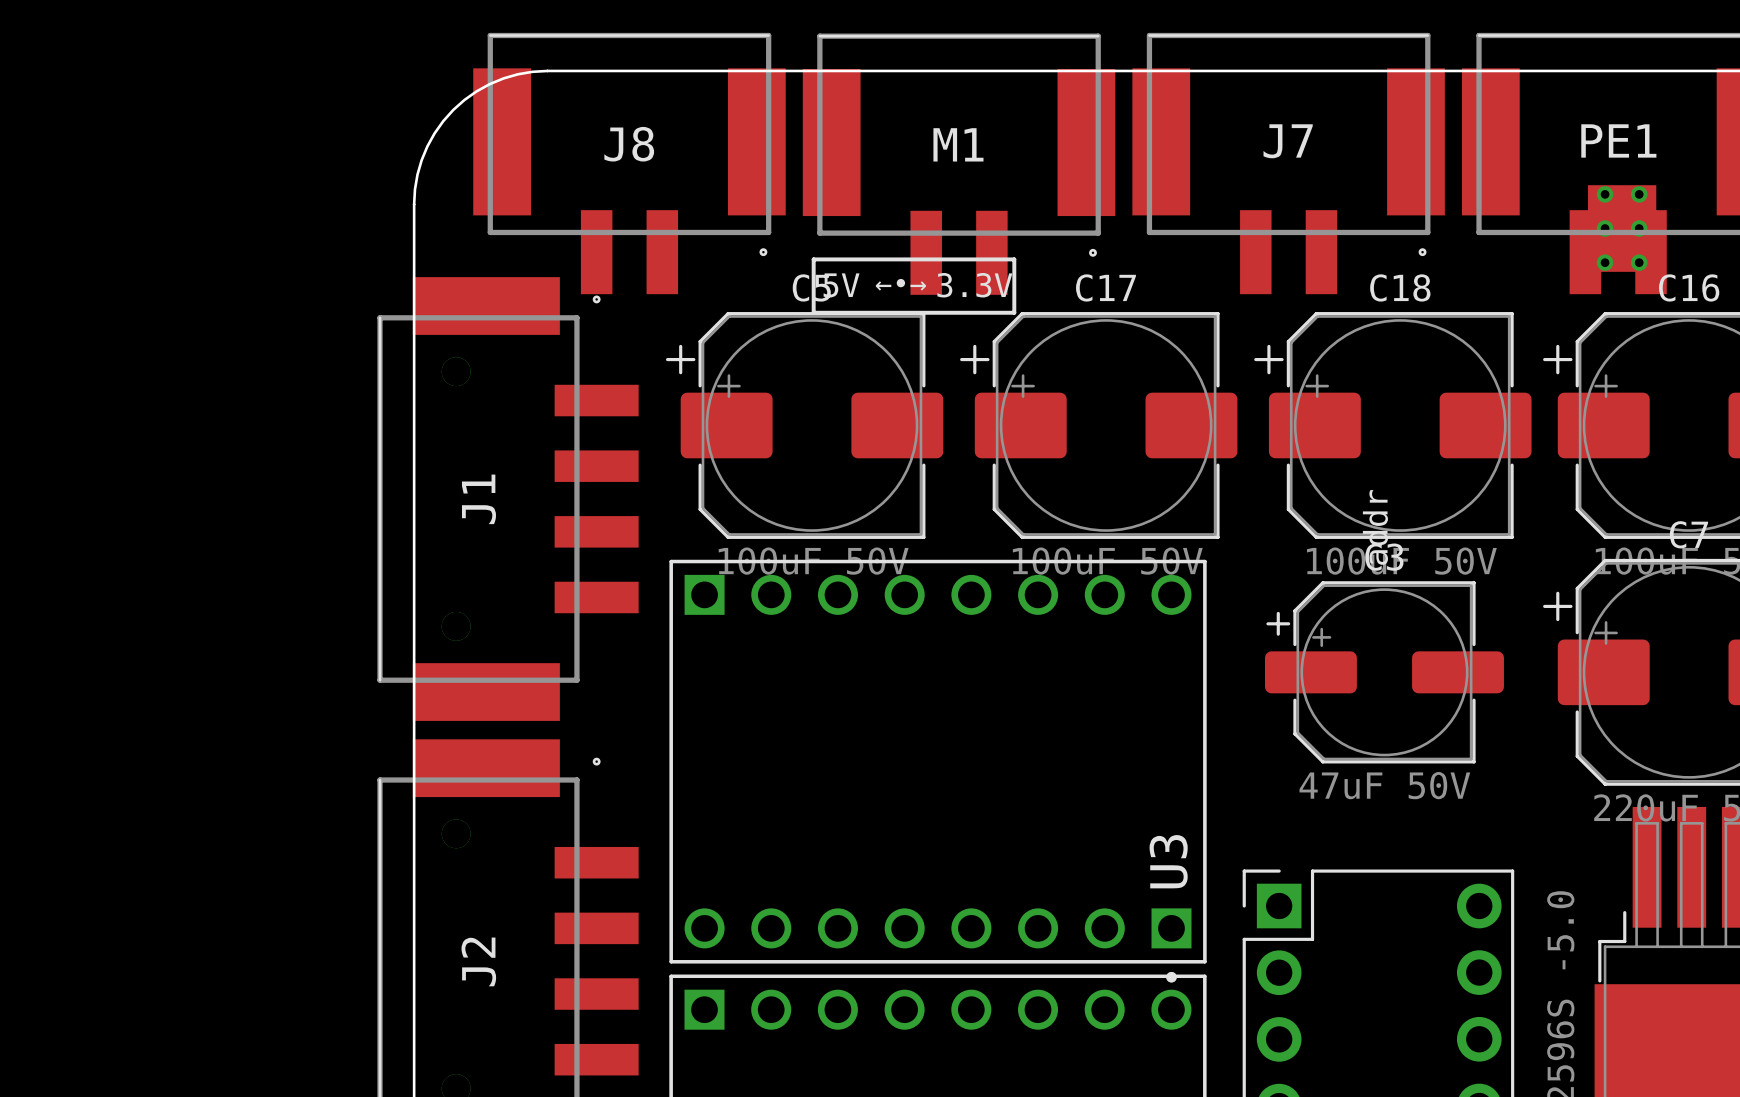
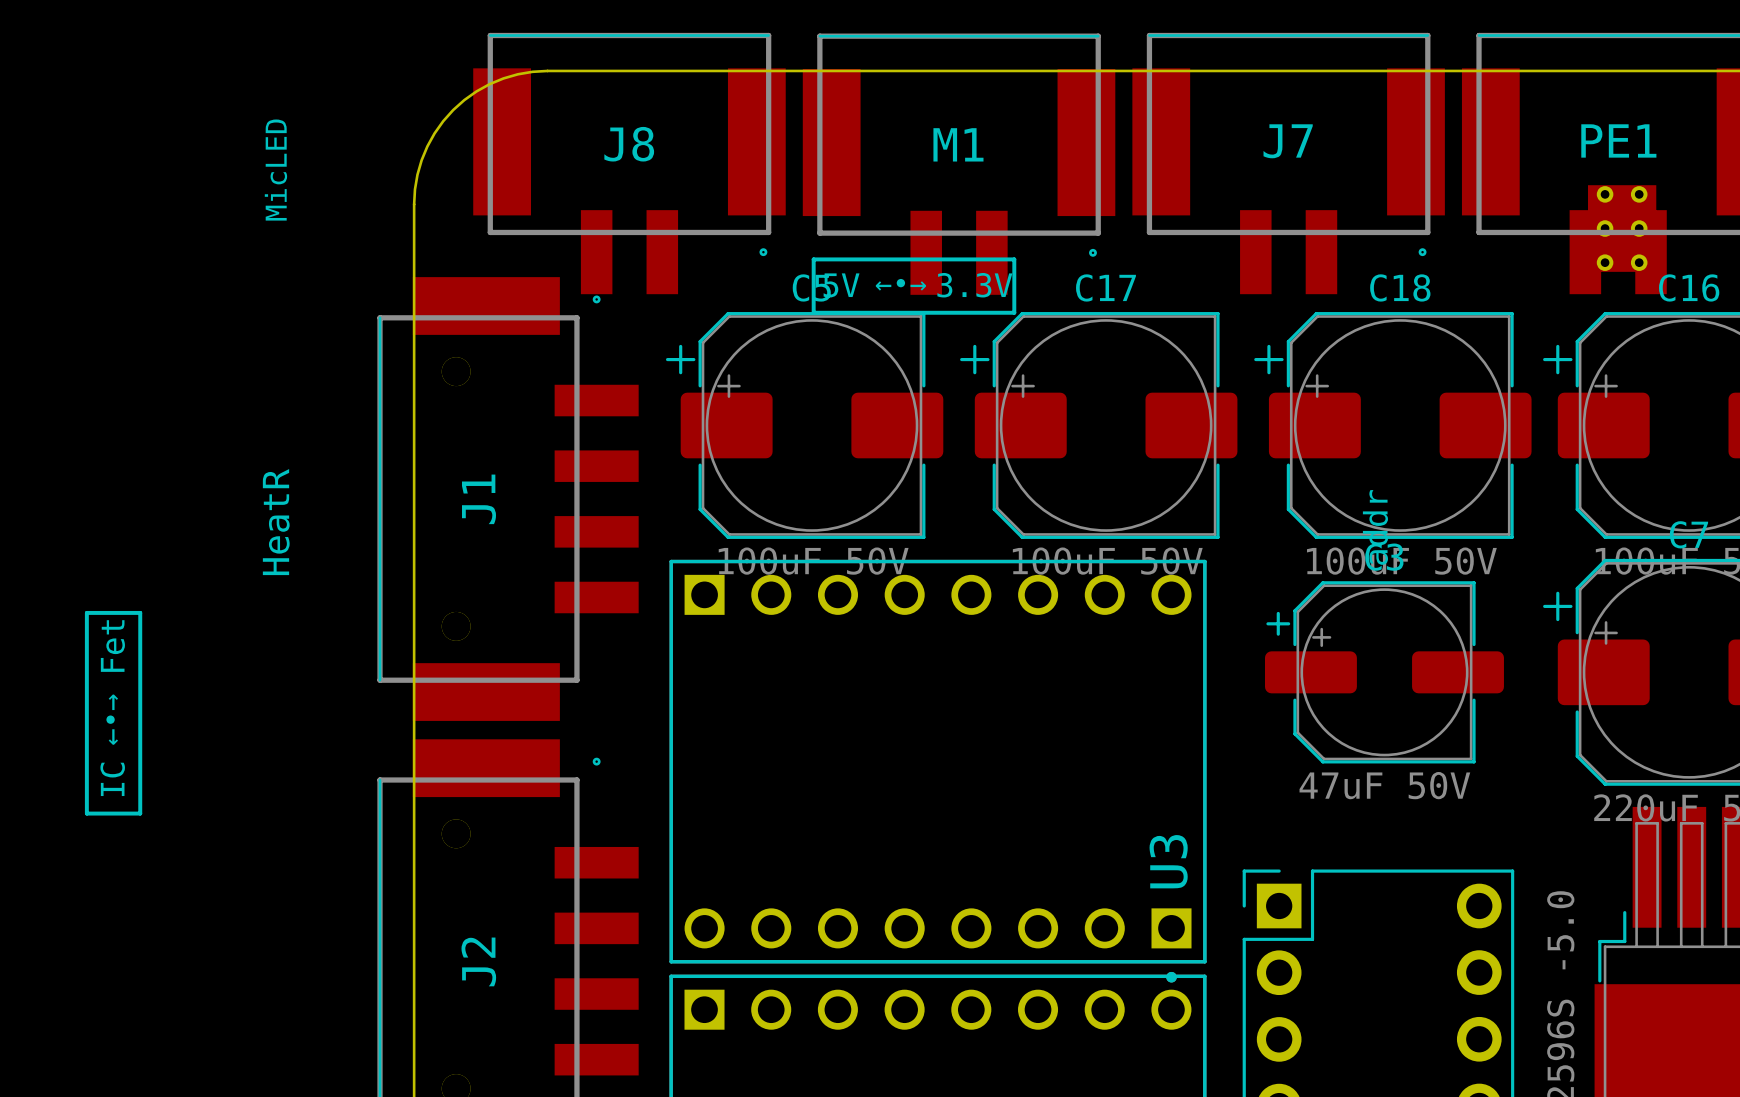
text: none -> MicLED (275, 170)
text: none -> HeatR (276, 522)
line: none -> (86, 612) (140, 612) (140, 813) (86, 813) (86, 612)
text: none -> Fet (112, 646)
text: none -> ←•→ (112, 719)
text: none -> IC (112, 779)

